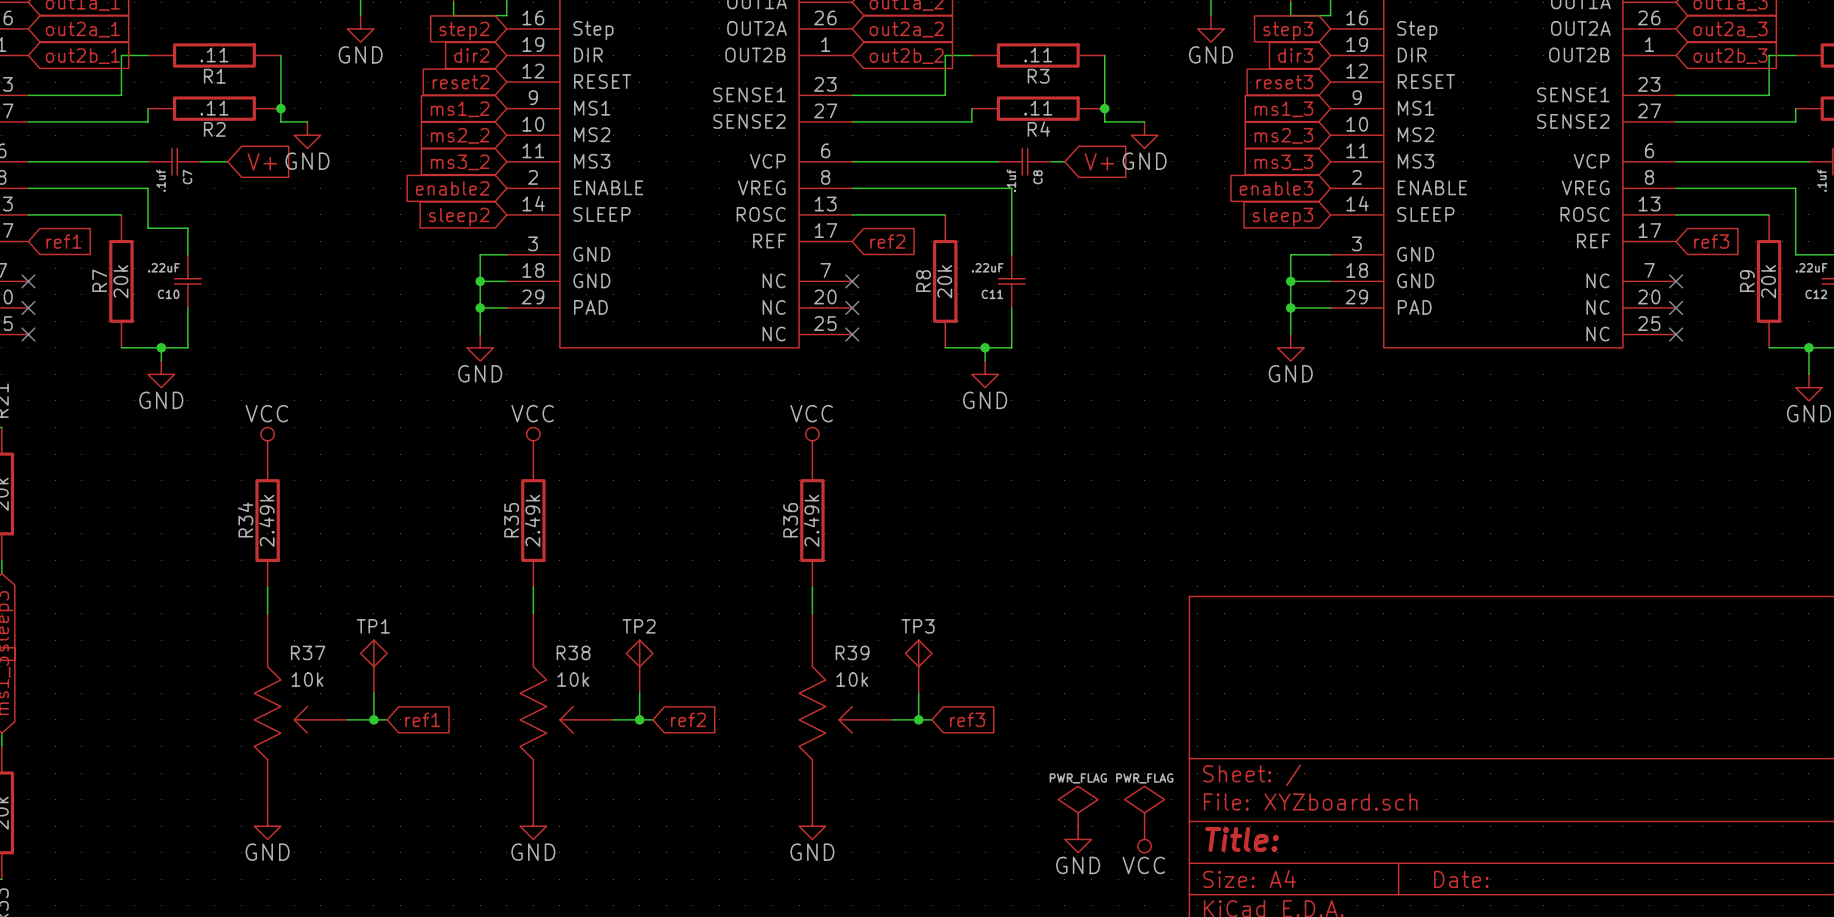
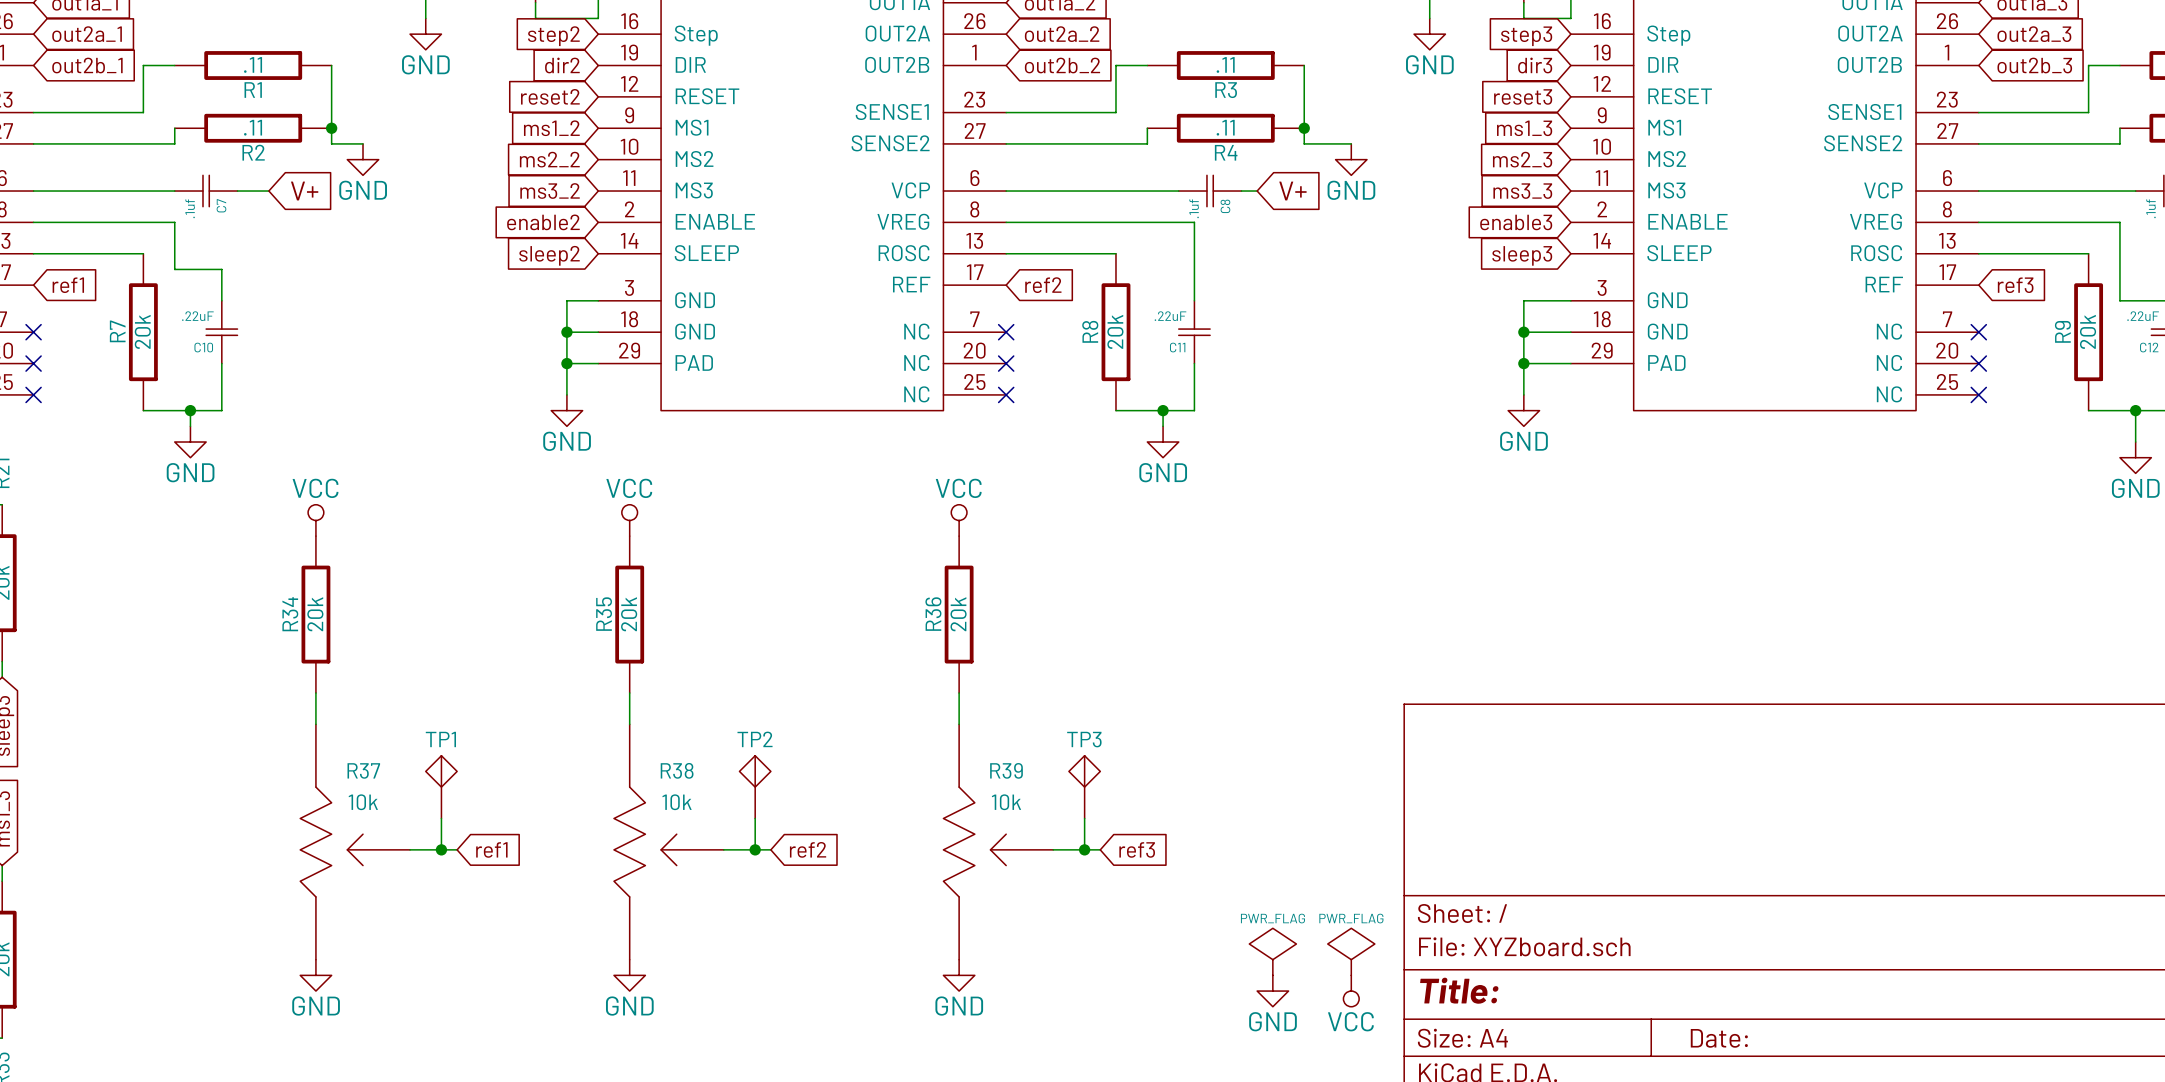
R34 value: 2.49k (266, 520) -> 20k (315, 614)
R35 value: 2.49k (532, 520) -> 20k (629, 614)
R36 value: 2.49k (811, 520) -> 20k (958, 614)

